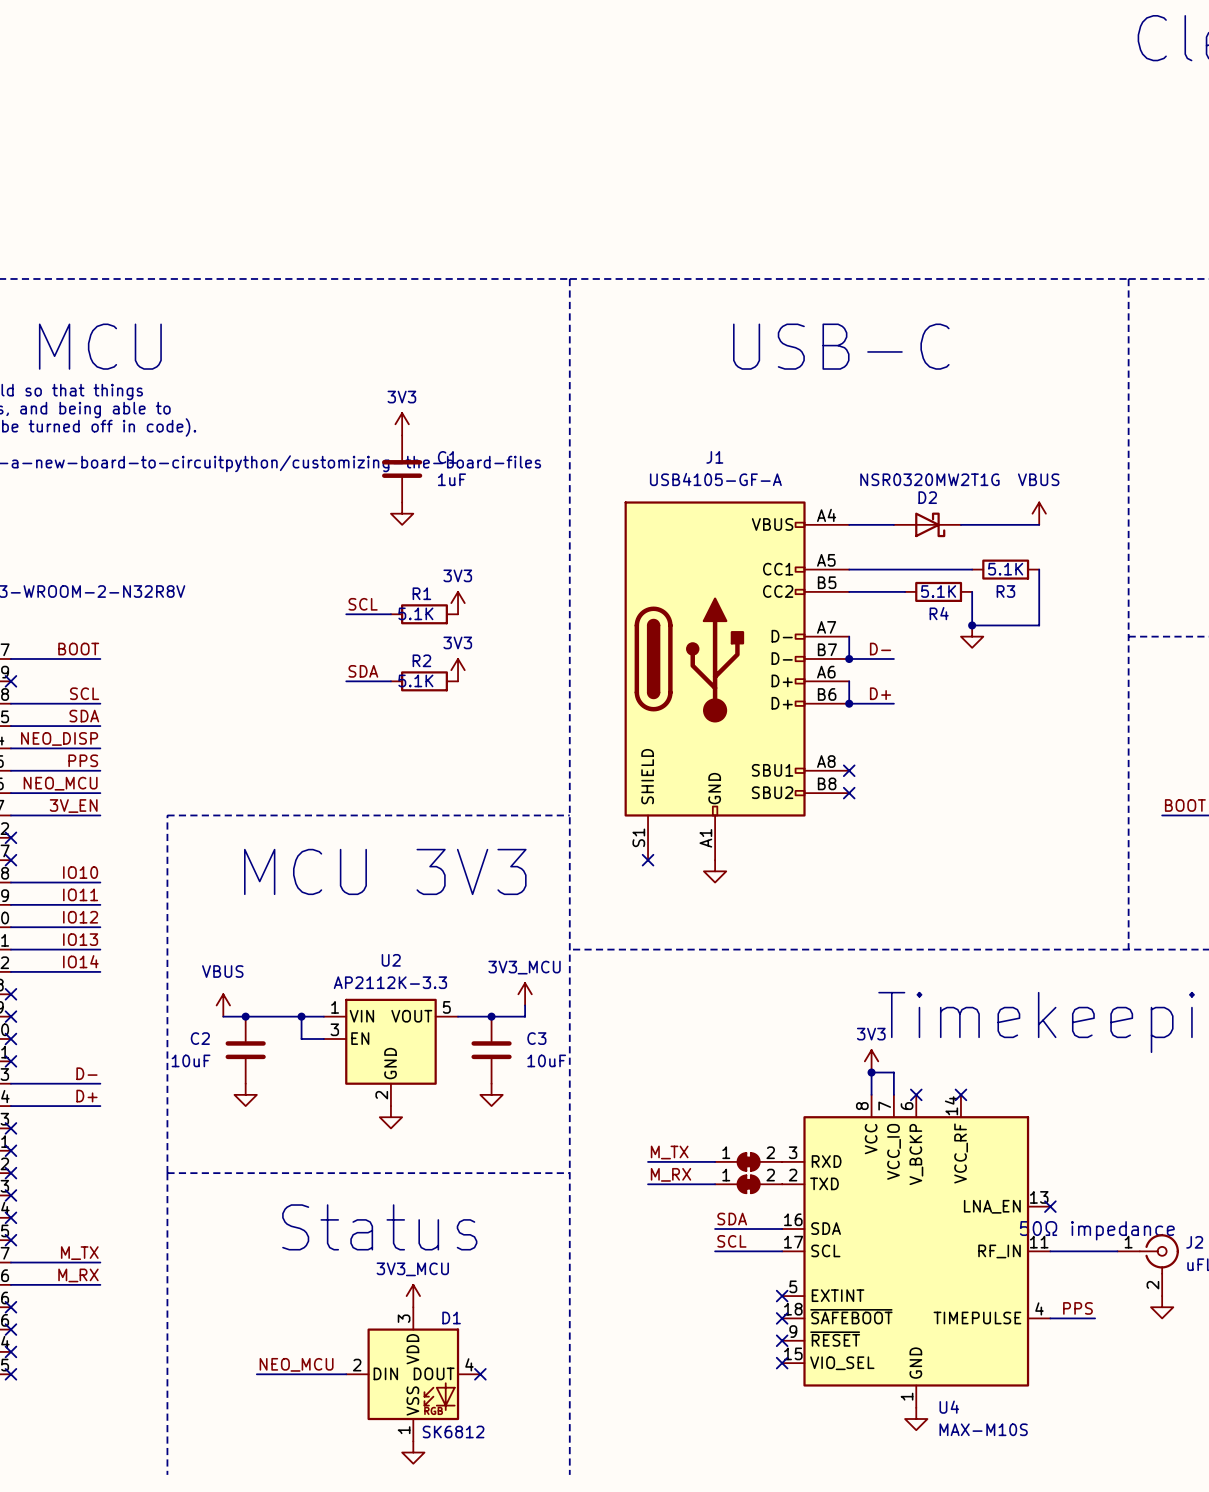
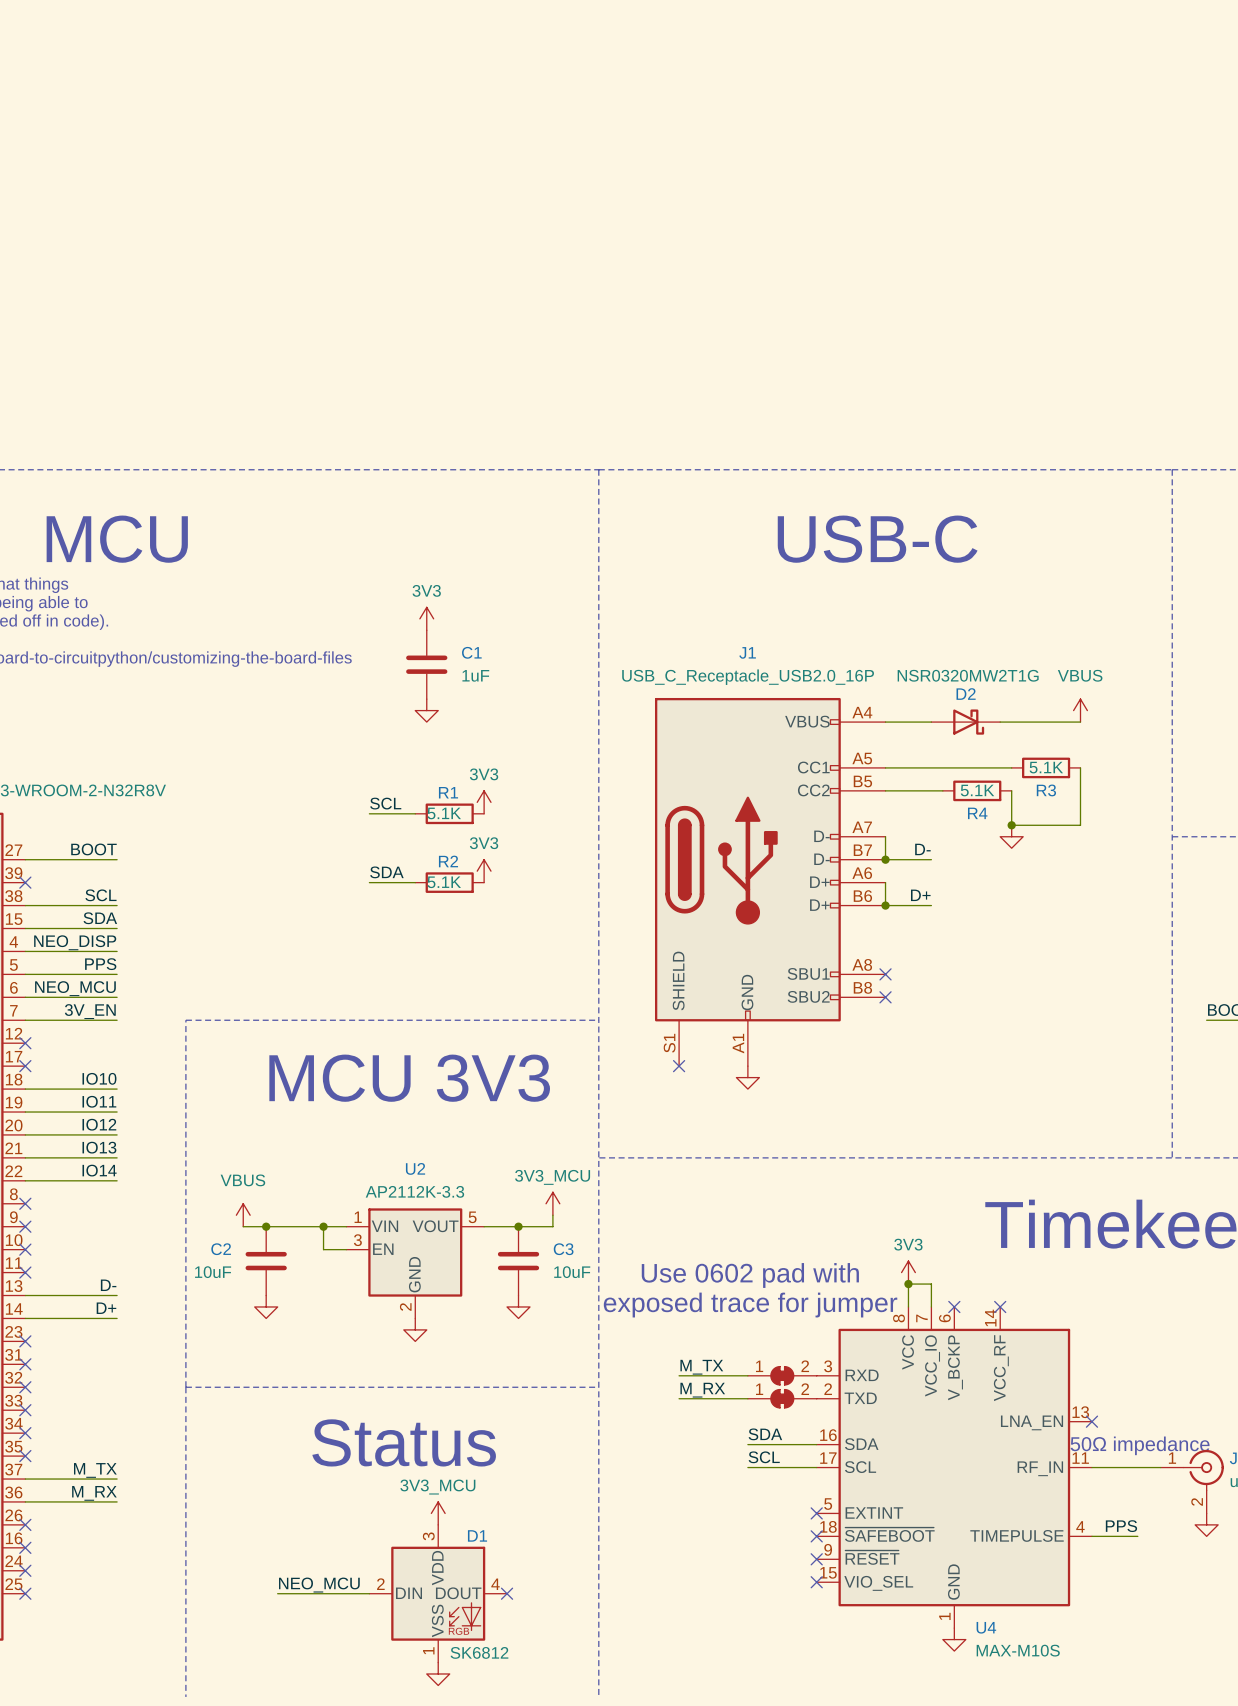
J1 value: USB4105-GF-A (715, 479) -> USB_C_Receptacle_USB2.0_16P (748, 677)
text: none -> Use 0602 pad with (750, 1275)
text: none -> exposed trace for jumper (750, 1305)

